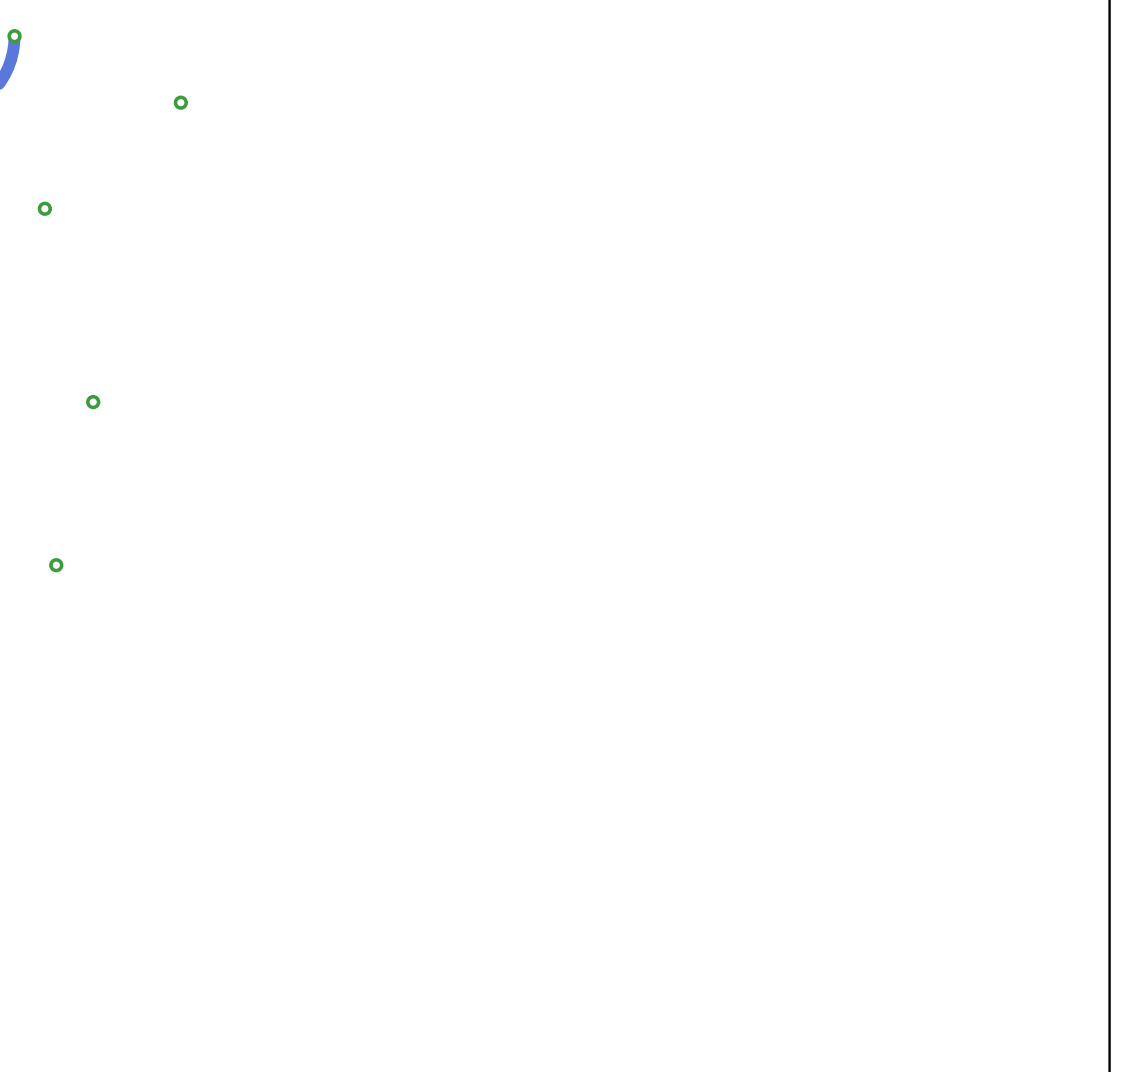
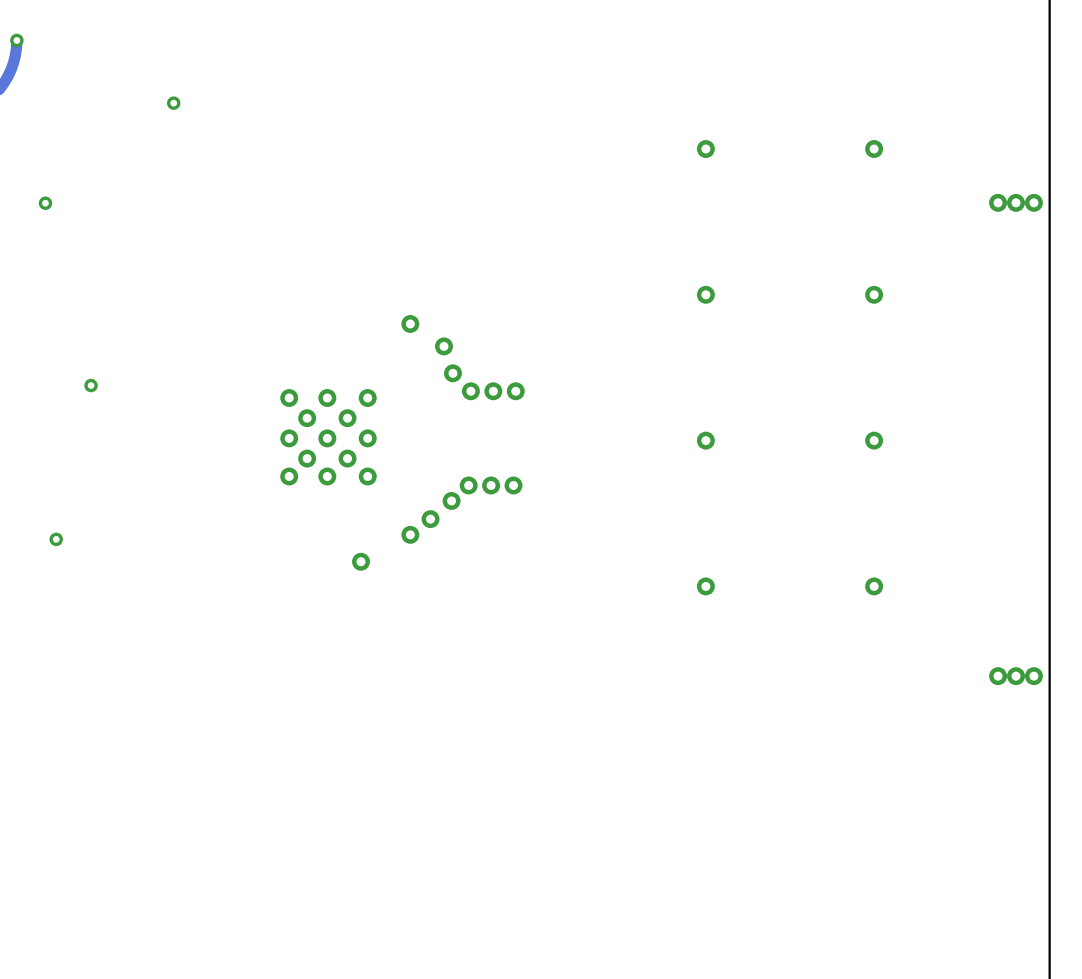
via: none -> (705, 149)
via: none -> (874, 149)
via: none -> (998, 202)
via: none -> (1016, 202)
via: none -> (1033, 202)
via: none -> (705, 294)
via: none -> (874, 294)
via: none -> (410, 323)
via: none -> (443, 346)
via: none -> (452, 373)
via: none -> (470, 391)
via: none -> (493, 391)
via: none -> (515, 391)
via: none -> (289, 398)
via: none -> (327, 398)
via: none -> (367, 398)
via: none -> (307, 418)
via: none -> (347, 418)
via: none -> (289, 438)
via: none -> (327, 438)
via: none -> (367, 438)
via: none -> (705, 440)
via: none -> (874, 440)
via: none -> (307, 458)
via: none -> (347, 458)
via: none -> (289, 476)
via: none -> (327, 476)
via: none -> (367, 476)
via: none -> (468, 485)
via: none -> (491, 485)
via: none -> (513, 485)
via: none -> (451, 500)
via: none -> (430, 519)
via: none -> (410, 534)
via: none -> (361, 561)
via: none -> (705, 586)
via: none -> (874, 586)
via: none -> (998, 676)
via: none -> (1016, 676)
via: none -> (1033, 676)

